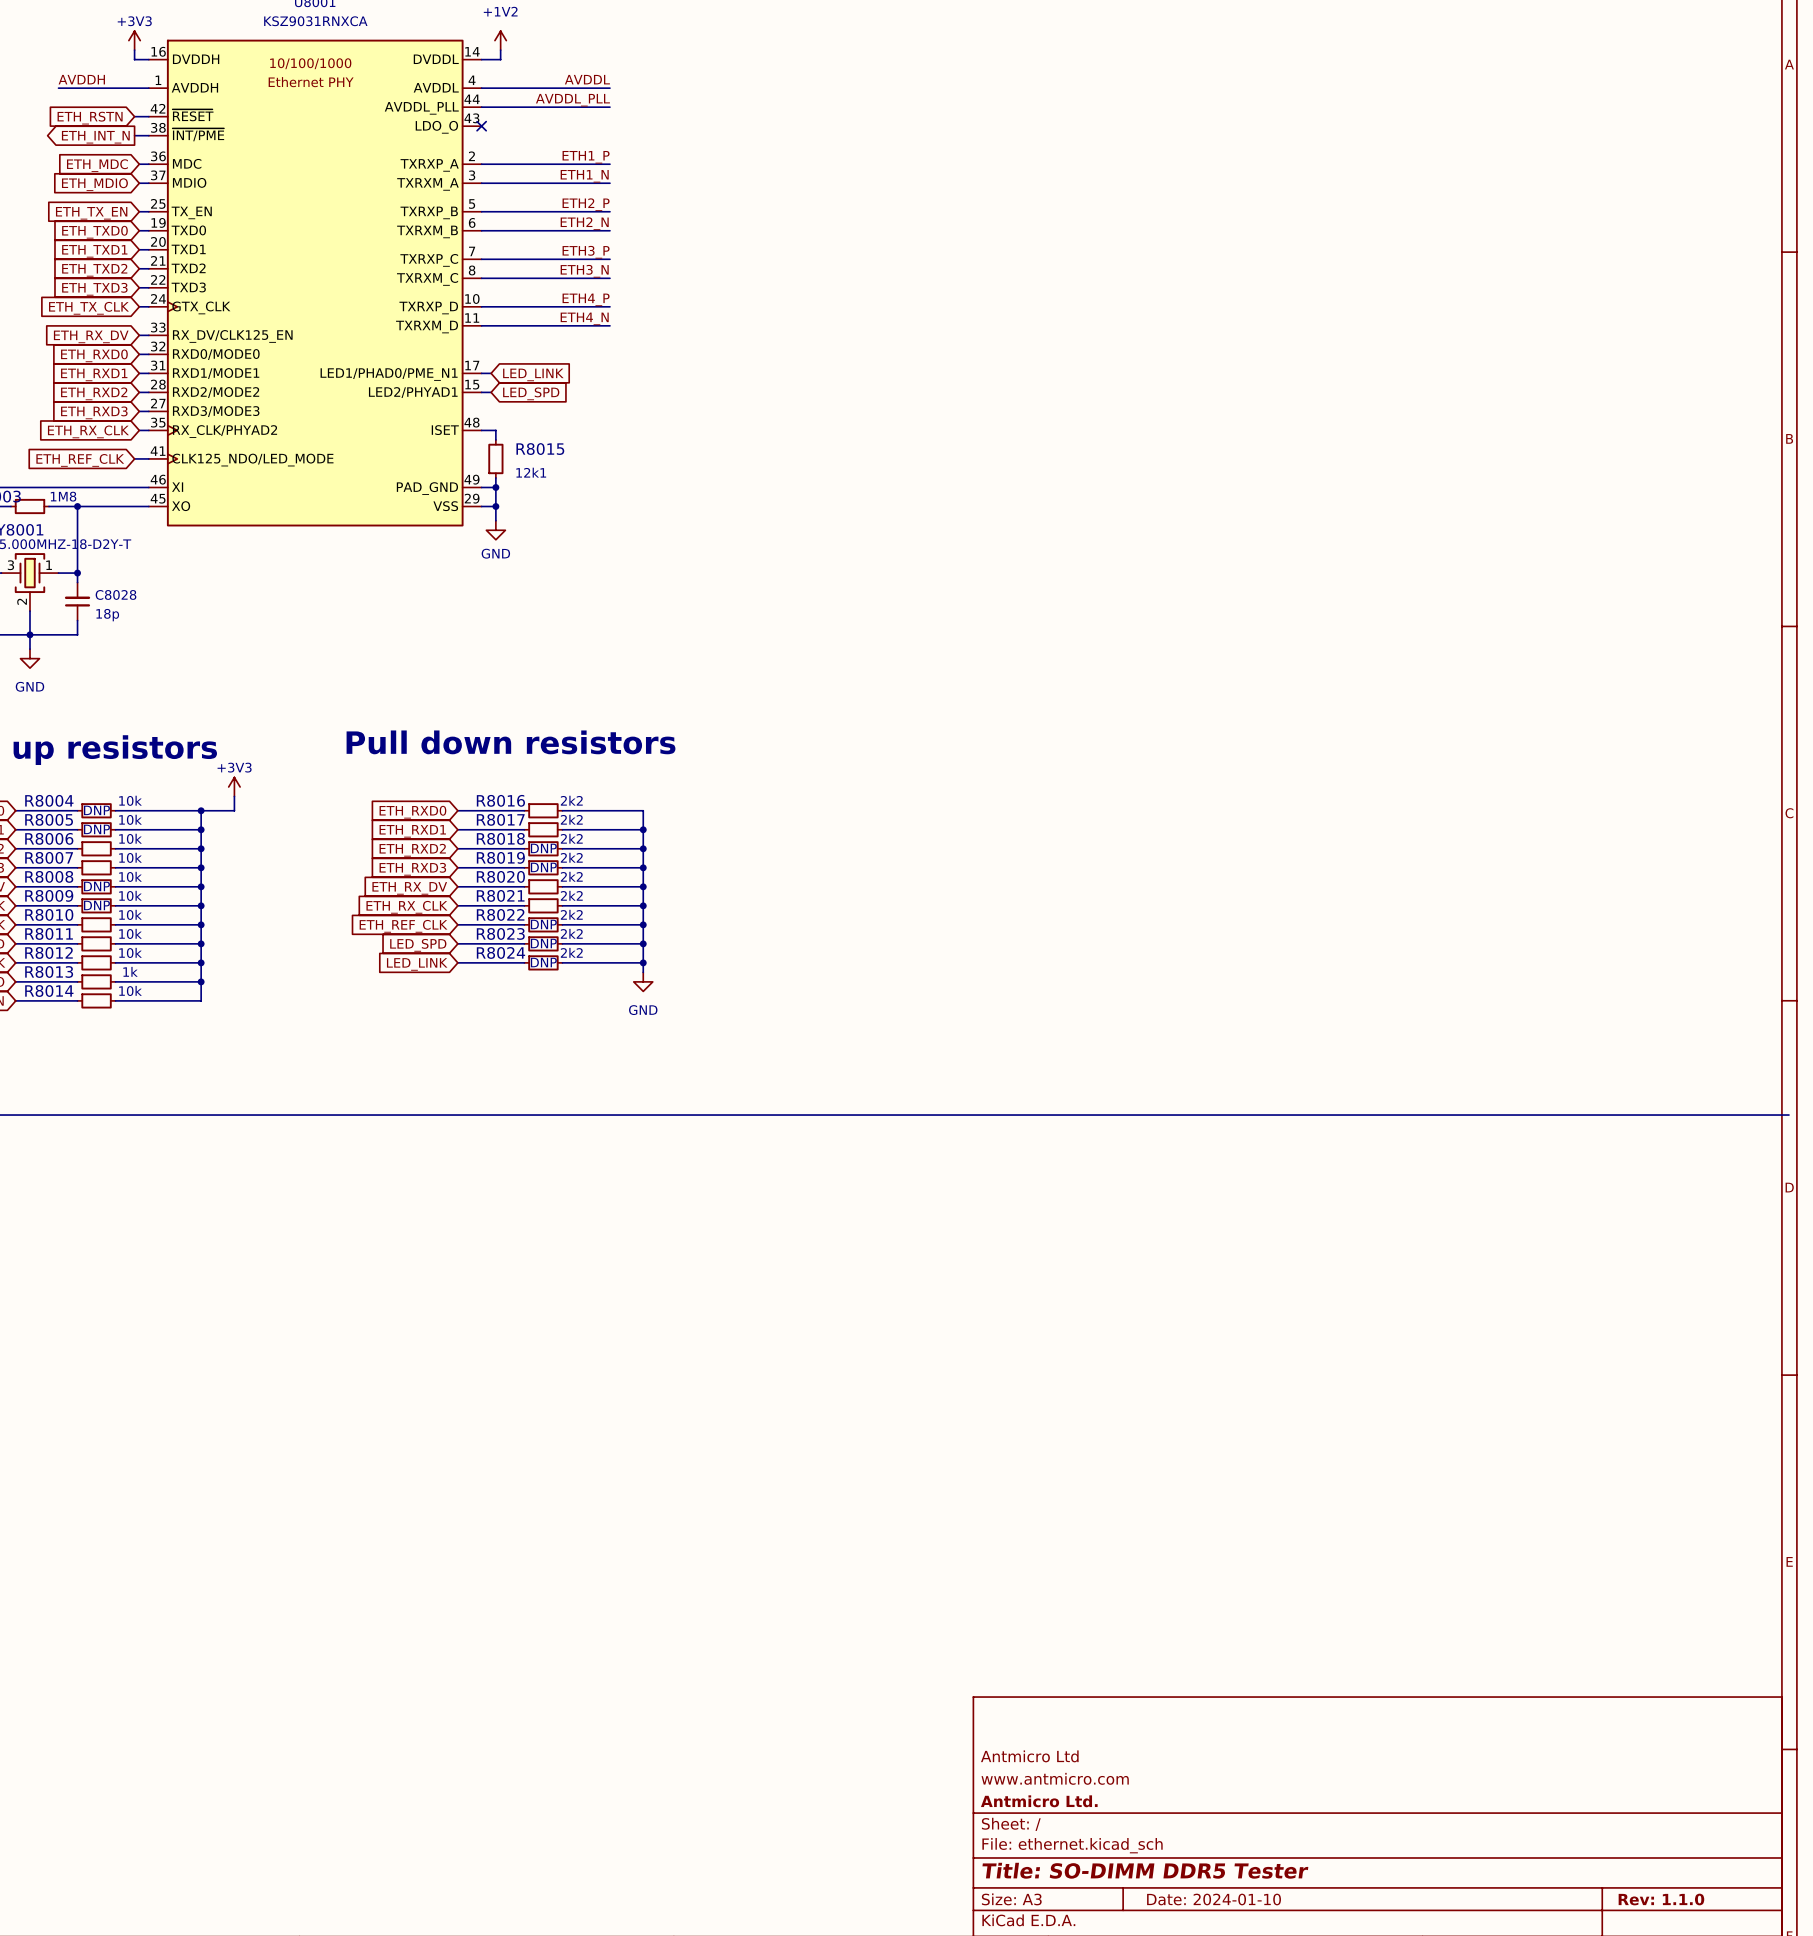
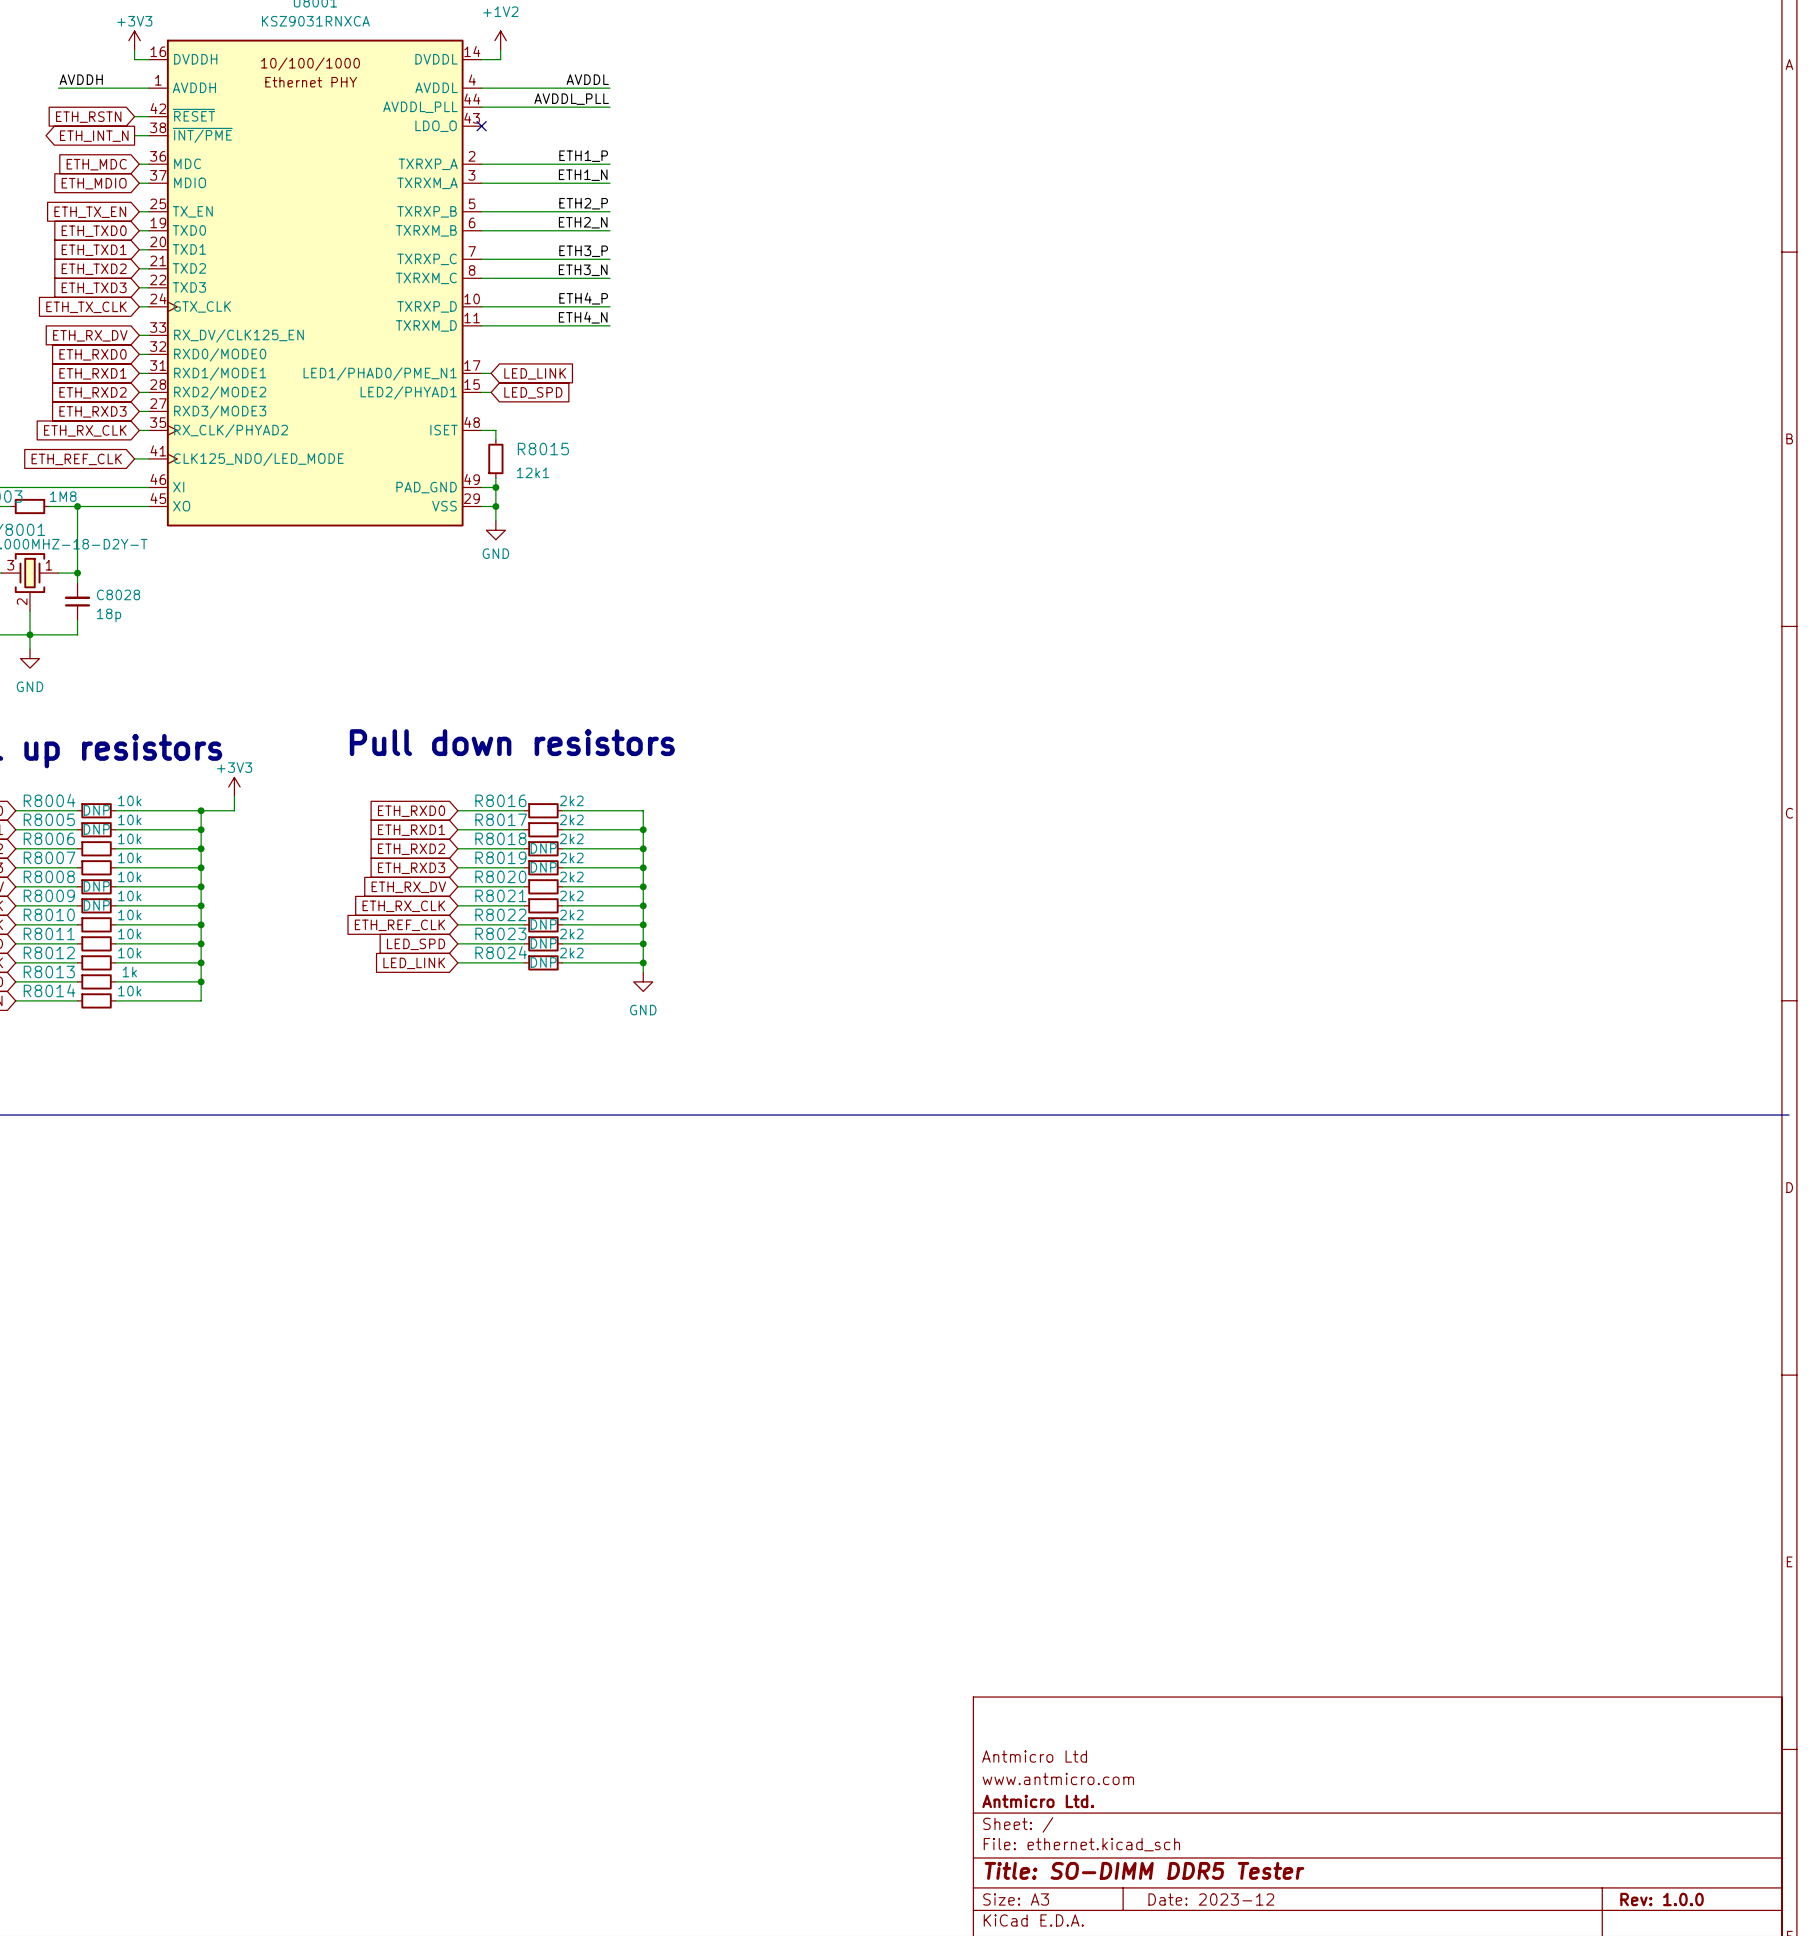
title block: Date: 2024-01-10 (1214, 1899) -> Date: 2023-12 (1211, 1899)
title block: Rev: 1.1.0 (1661, 1899) -> Rev: 1.0.0 (1662, 1899)

